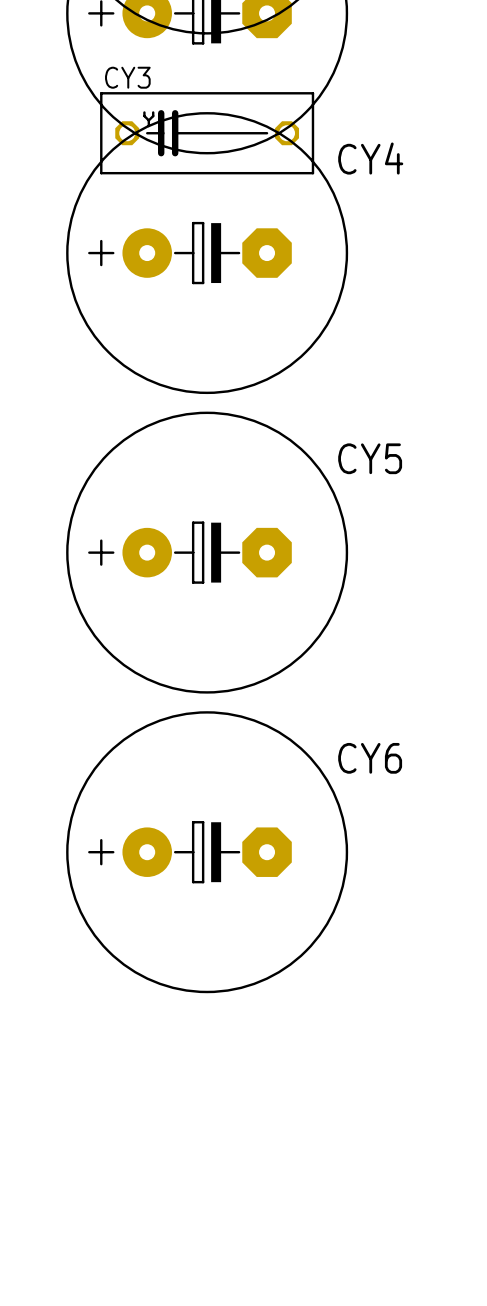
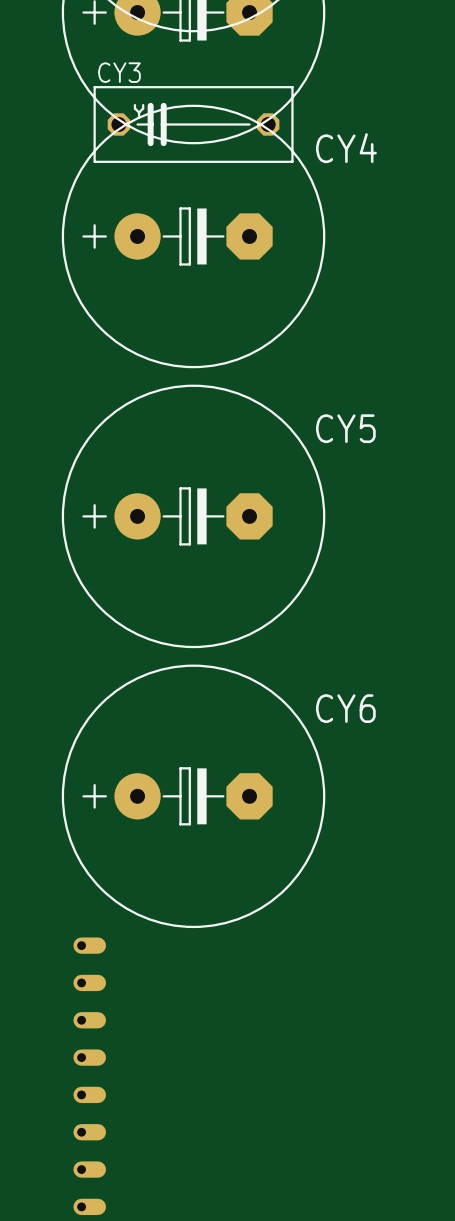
part: none -> (89, 945)
part: none -> (89, 982)
part: none -> (89, 1020)
part: none -> (89, 1057)
part: none -> (89, 1094)
part: none -> (89, 1132)
part: none -> (89, 1169)
part: none -> (89, 1206)

